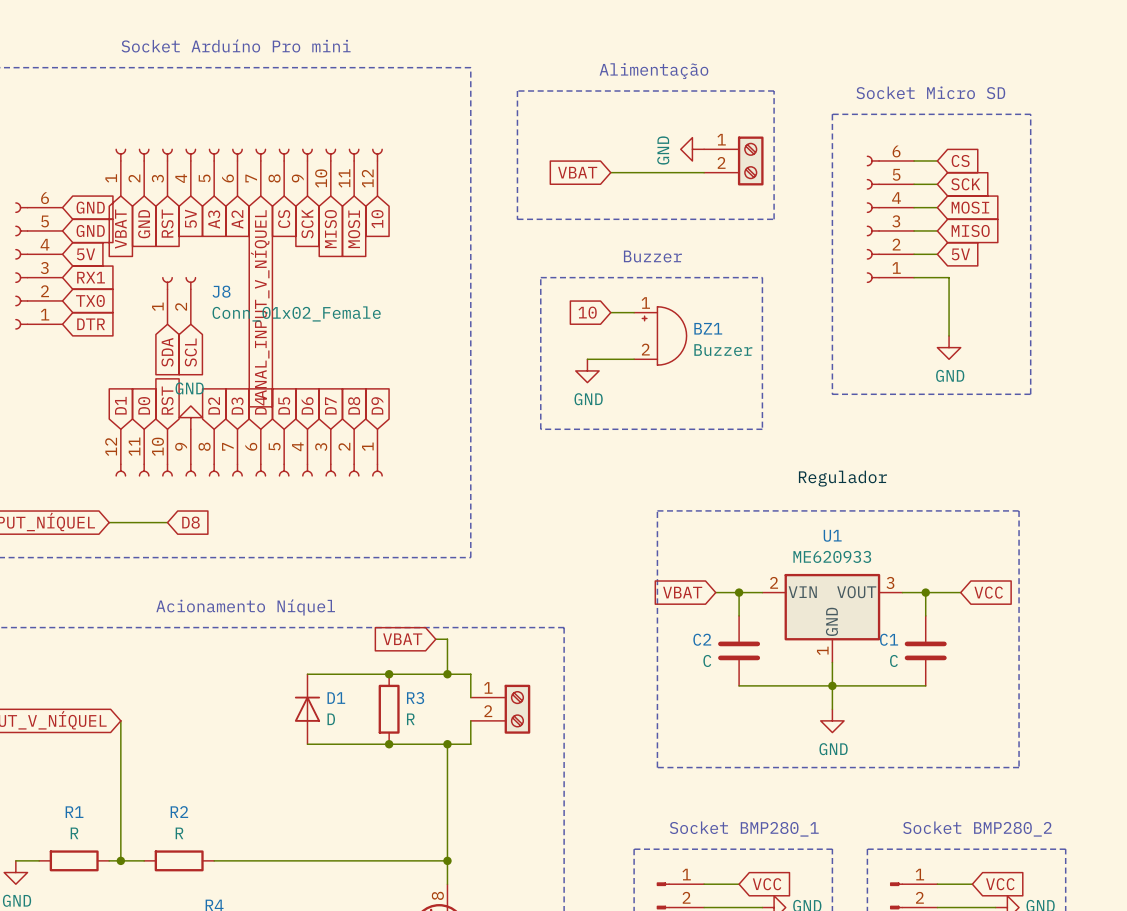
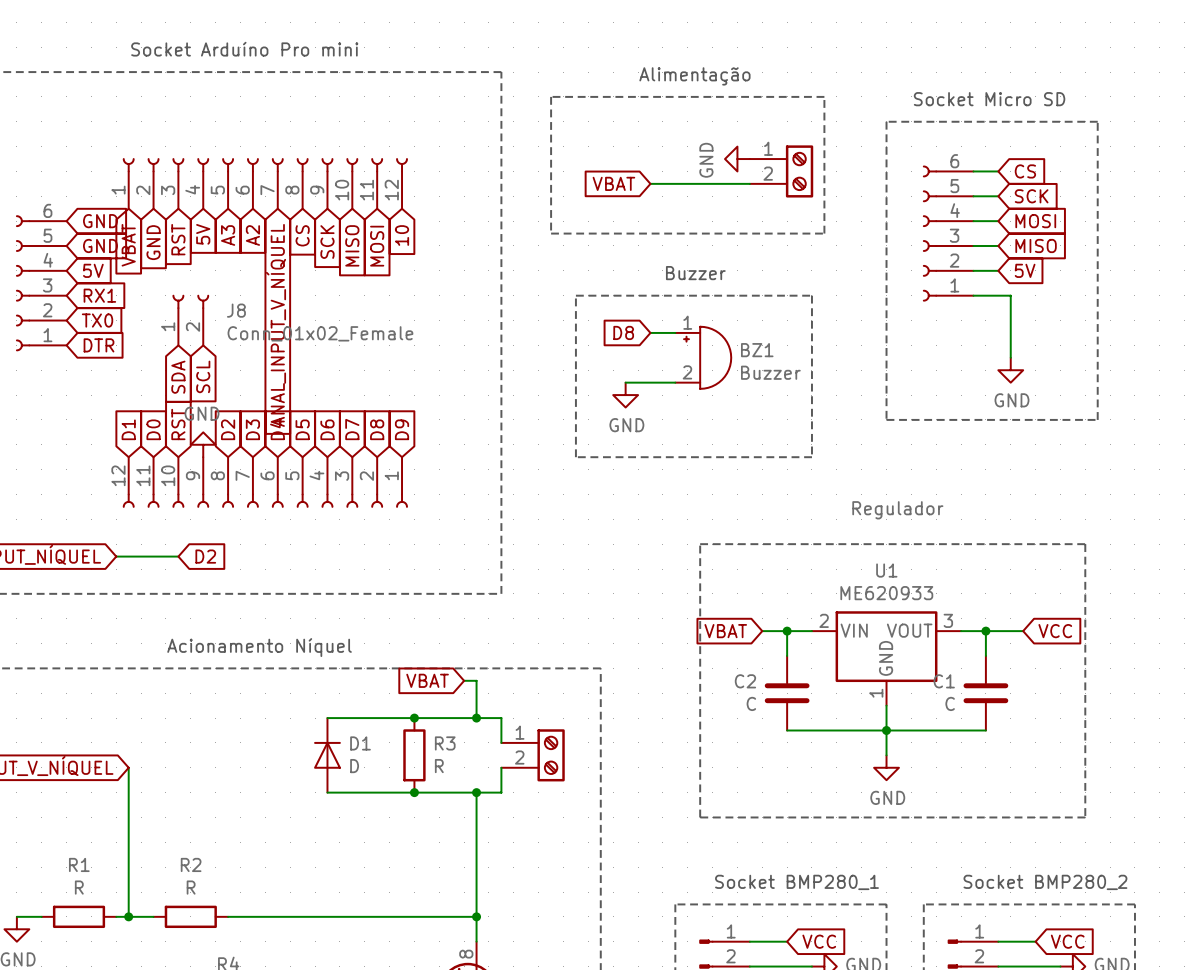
global label: 10 (587, 312) -> D8 (623, 332)
global label: D8 (190, 522) -> D2 (205, 556)

